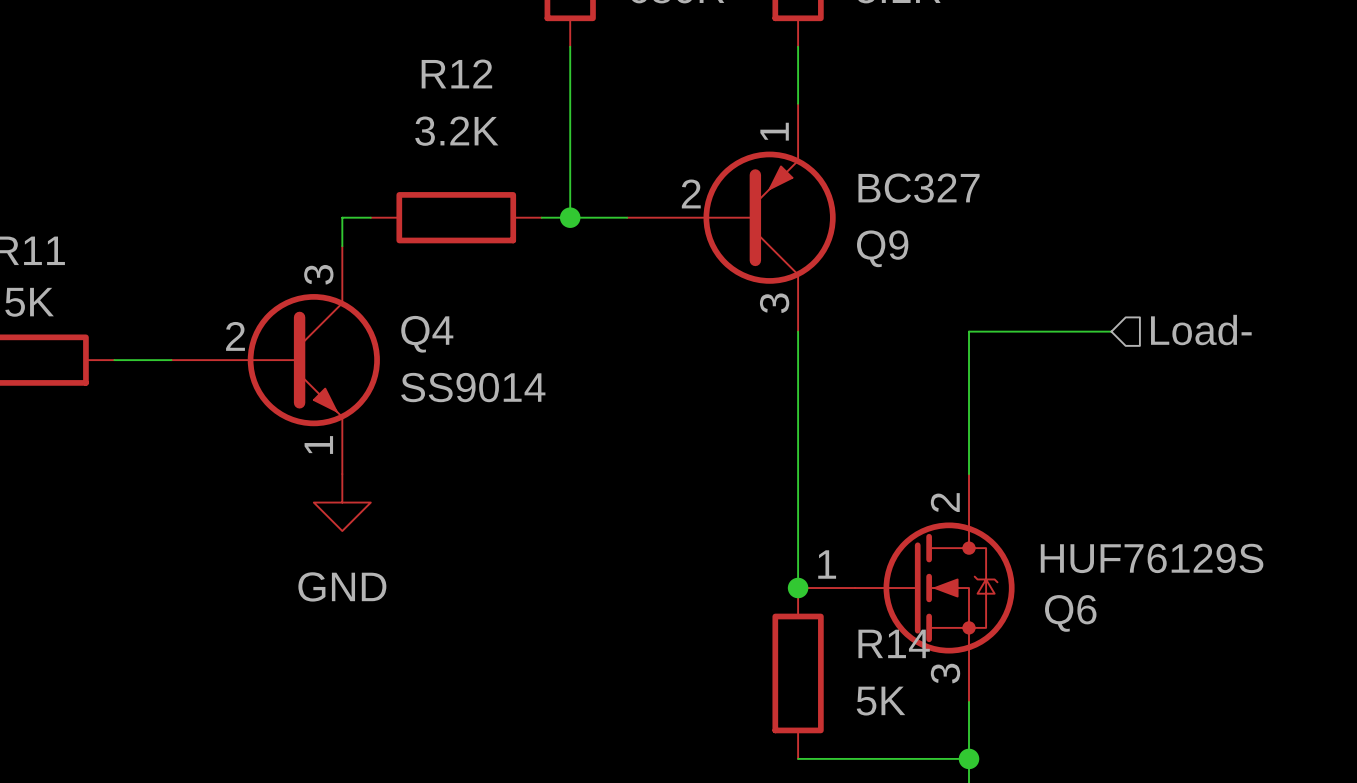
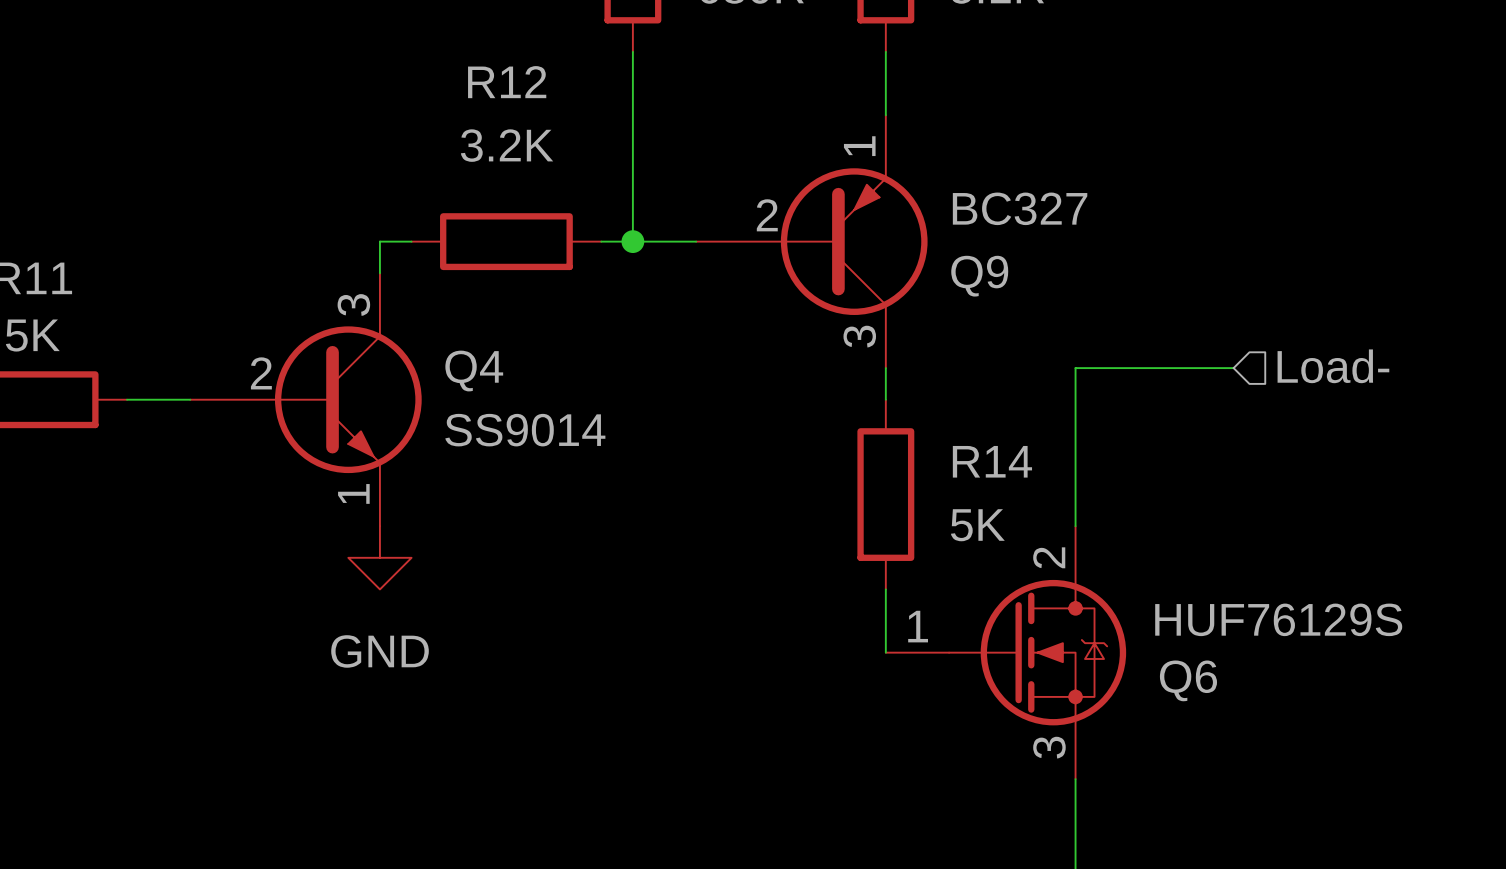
wire: (798, 360) (798, 531) -> none
junction: (798, 588) -> none
R14 position: (798, 673) -> (885, 494)
wire: (798, 758) (969, 758) -> none
junction: (969, 758) -> none

